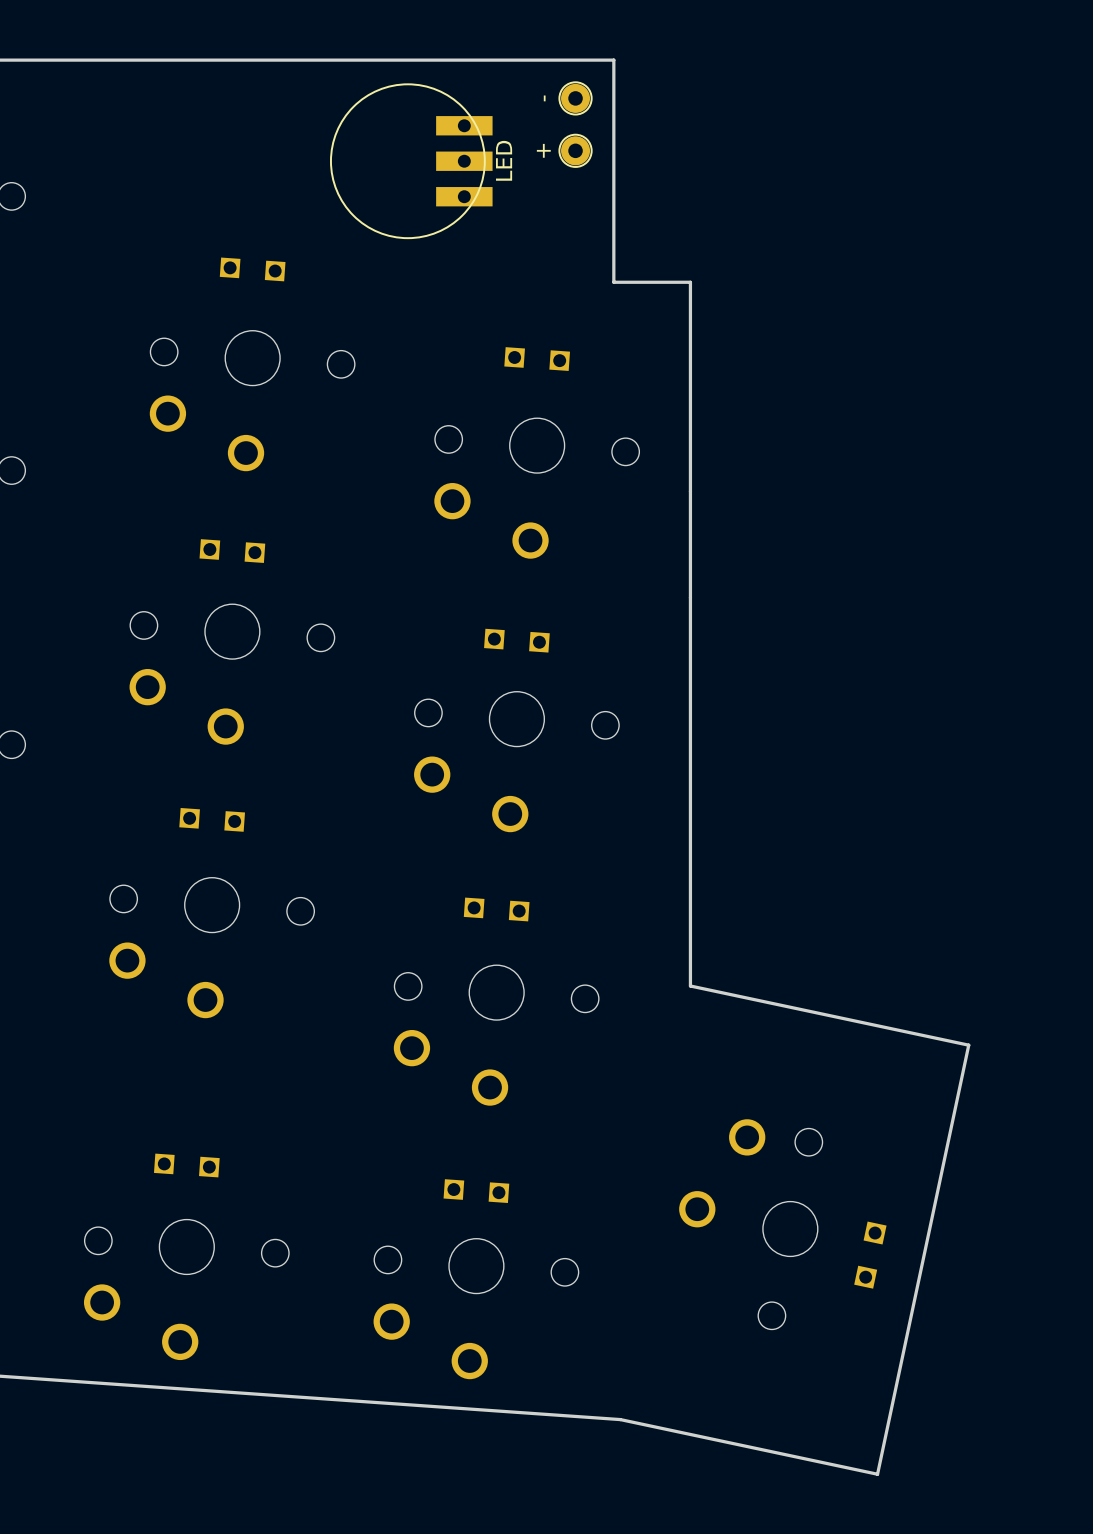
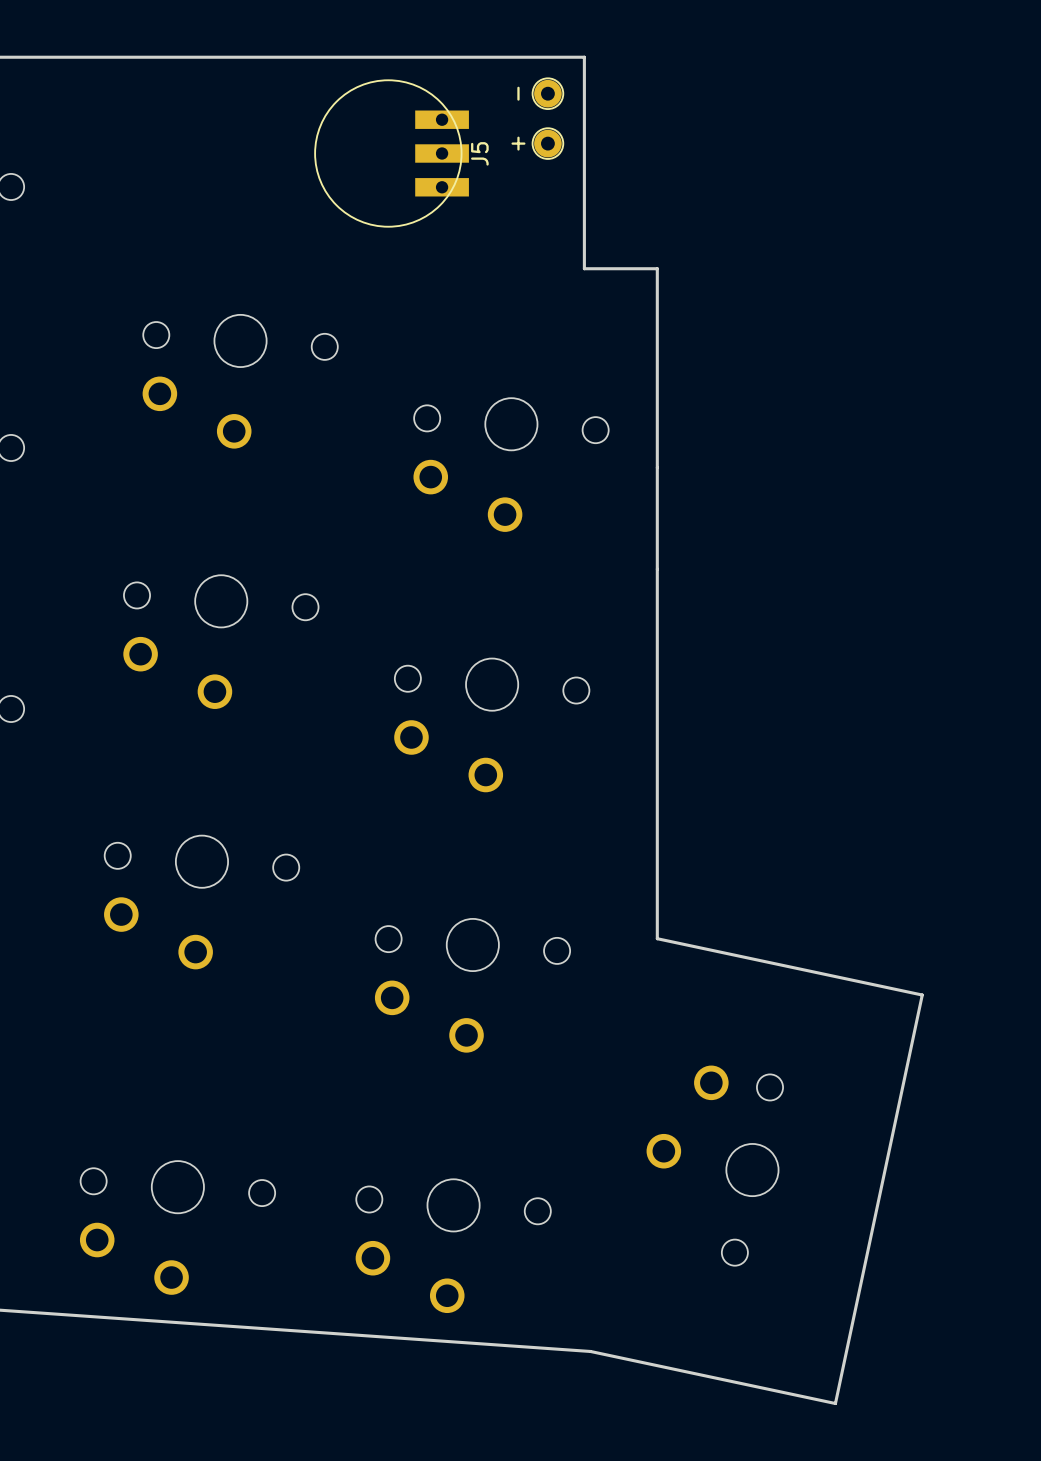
LED name: LED (504, 160) -> J5 (479, 153)
part: (252, 269) -> none
part: (537, 359) -> none
part: (232, 551) -> none
part: (516, 640) -> none
part: (212, 819) -> none
part: (496, 909) -> none
part: (186, 1165) -> none
part: (476, 1191) -> none
part: (870, 1255) -> none

